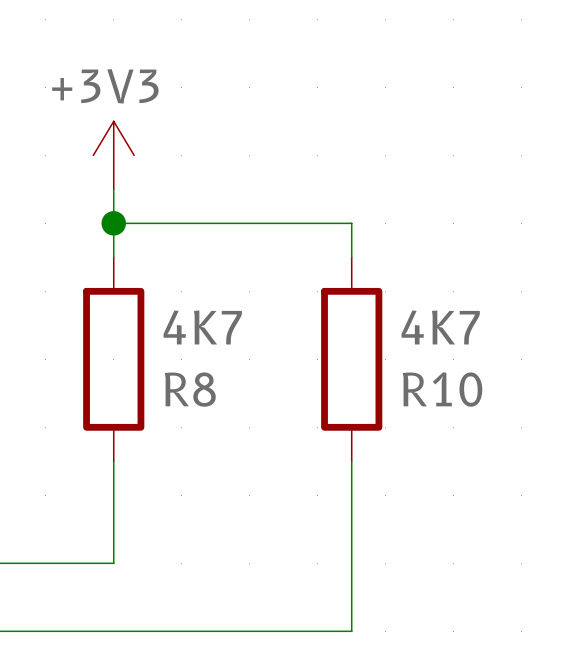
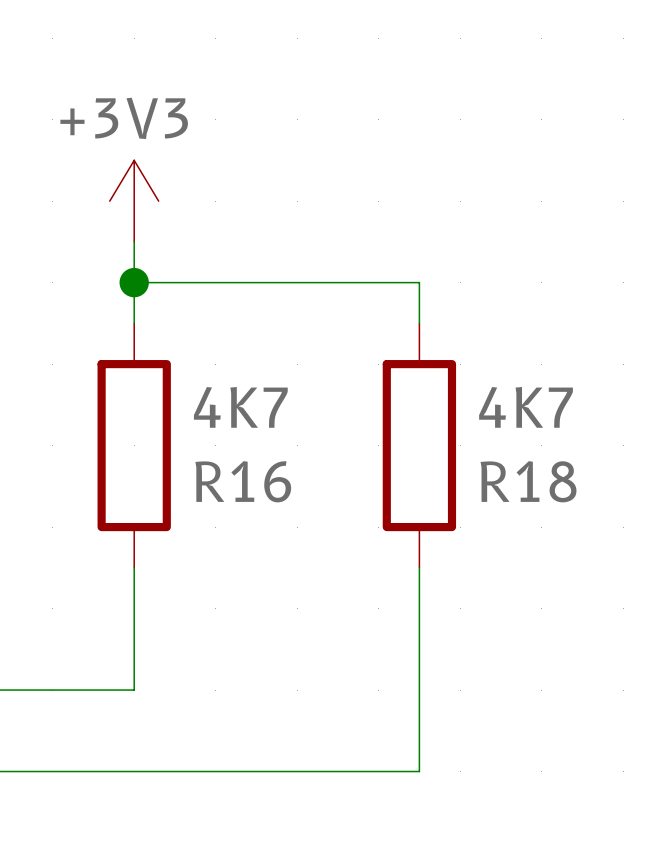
R8 name: R8 (190, 389) -> R16 (243, 481)
R10 name: R10 (442, 389) -> R18 (528, 481)

